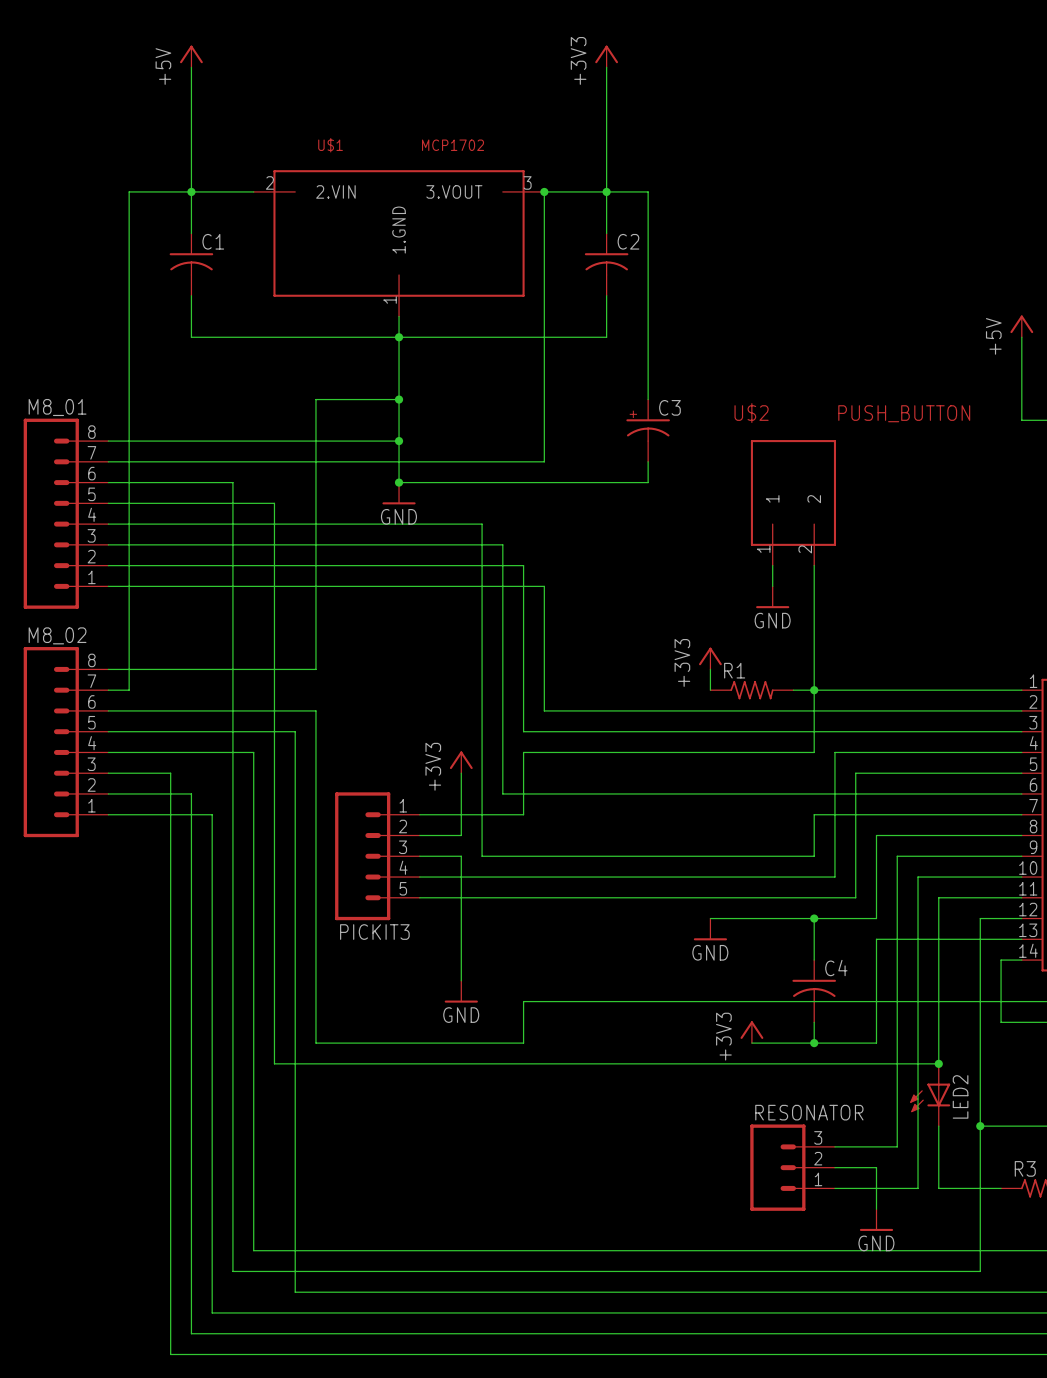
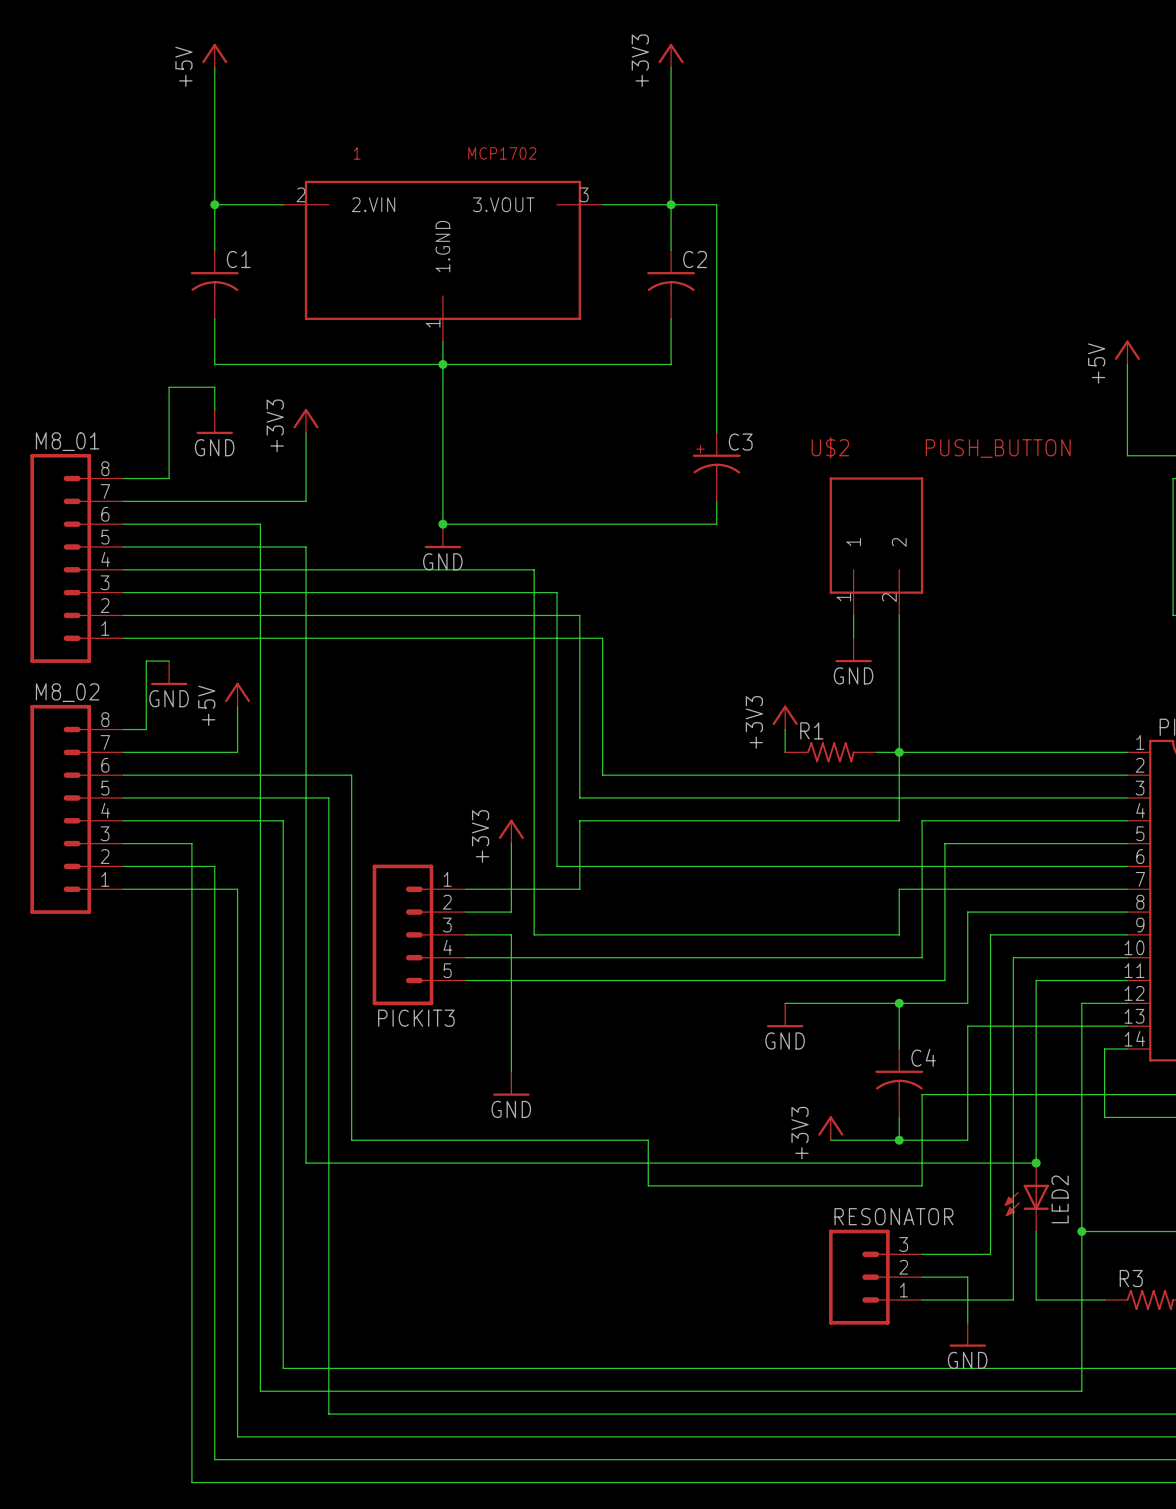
U$1 name: U$1 (330, 145) -> 1 (357, 153)
wire: (191, 191) (129, 191) (129, 607) -> (169, 661) (146, 661)
wire: (544, 191) (544, 461) (274, 461) -> (306, 432) (306, 501)
junction: (544, 191) -> none
power symbol: none -> +3V3 (306, 420)
power symbol: none -> GND (214, 422)
wire: (399, 399) (315, 399) (315, 669) (129, 669) (129, 690) -> (237, 706) (237, 752) (146, 752)
junction: (399, 399) -> none
wire: (149, 441) (399, 441) -> (169, 478) (169, 387) (214, 387) (214, 410)
junction: (399, 441) -> none
power symbol: none -> GND (169, 673)
power symbol: none -> +5V (237, 694)
wire: (834, 1001) (523, 1001) (523, 1043) -> (922, 1094) (922, 1185) (648, 1185) (648, 1140) (579, 1140)

